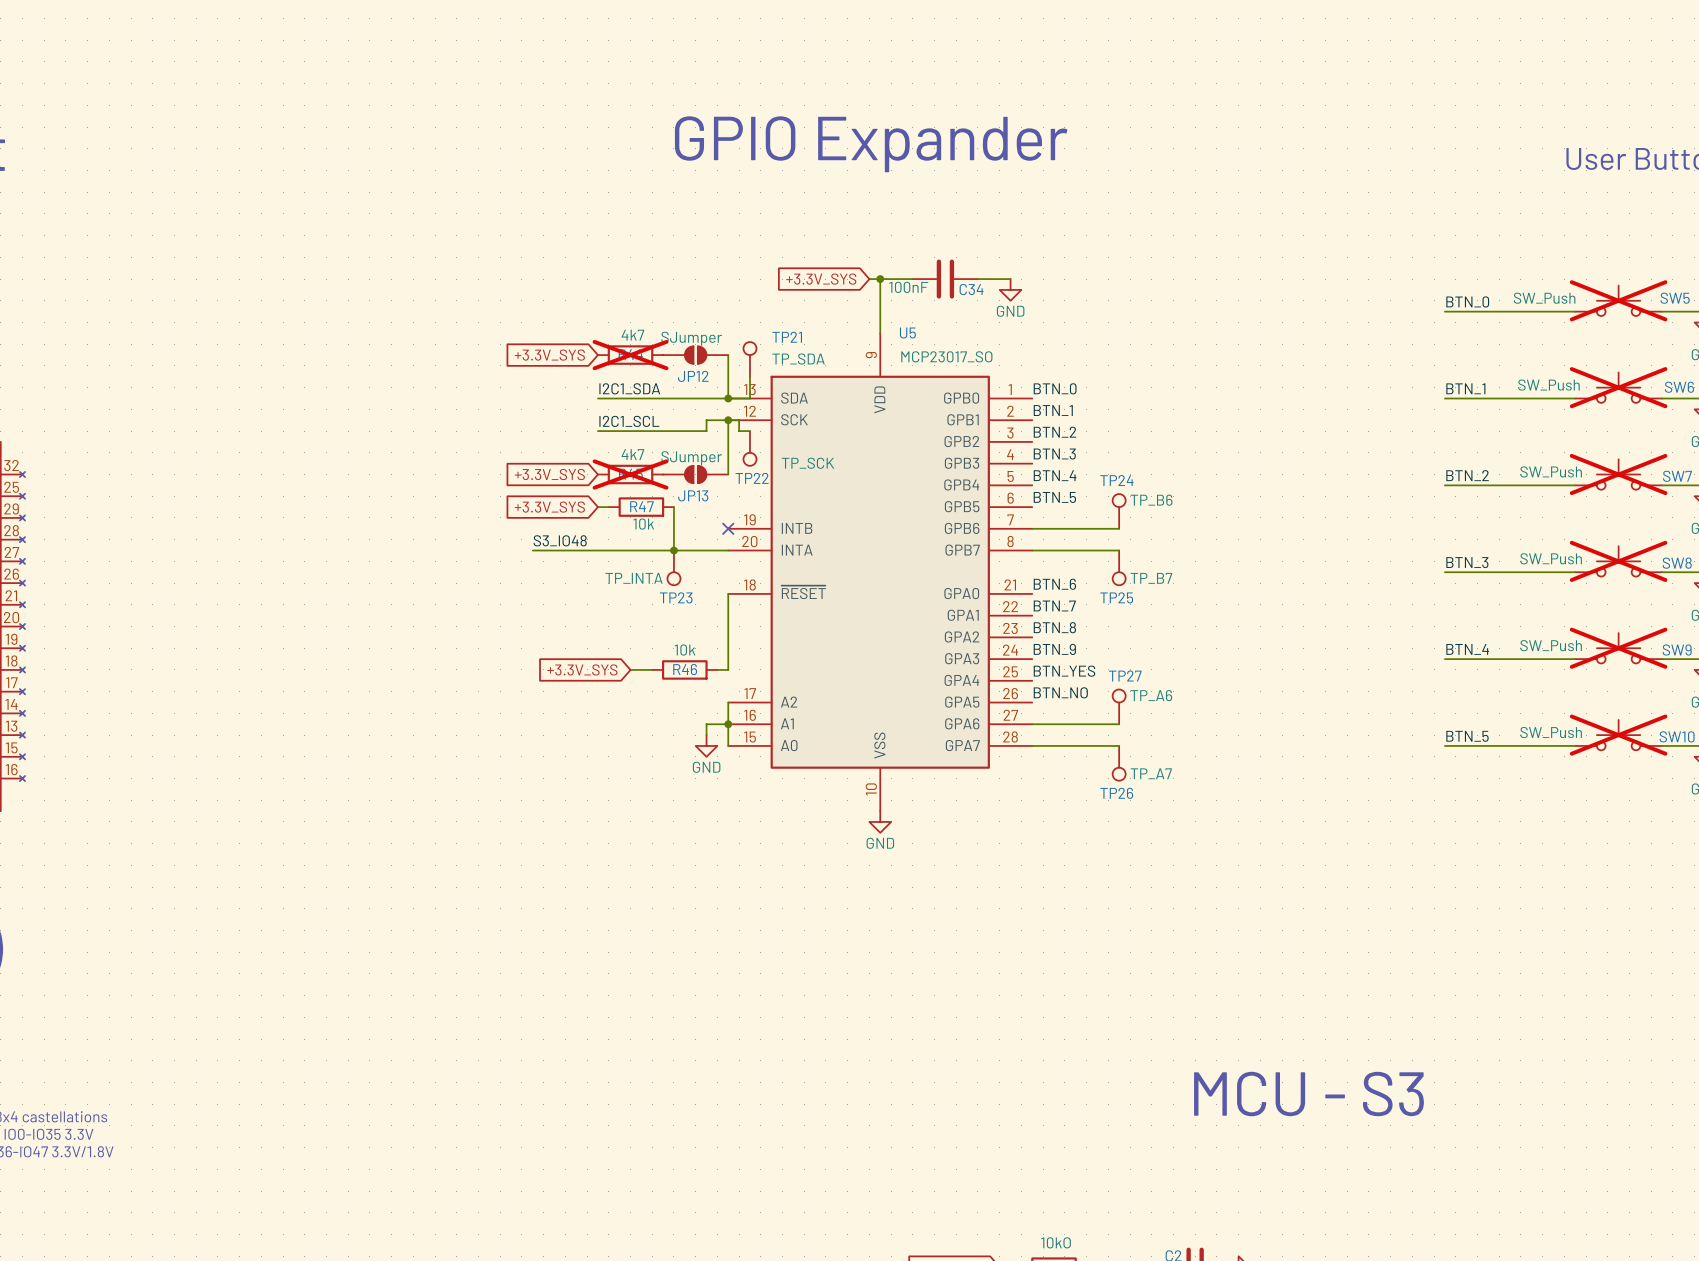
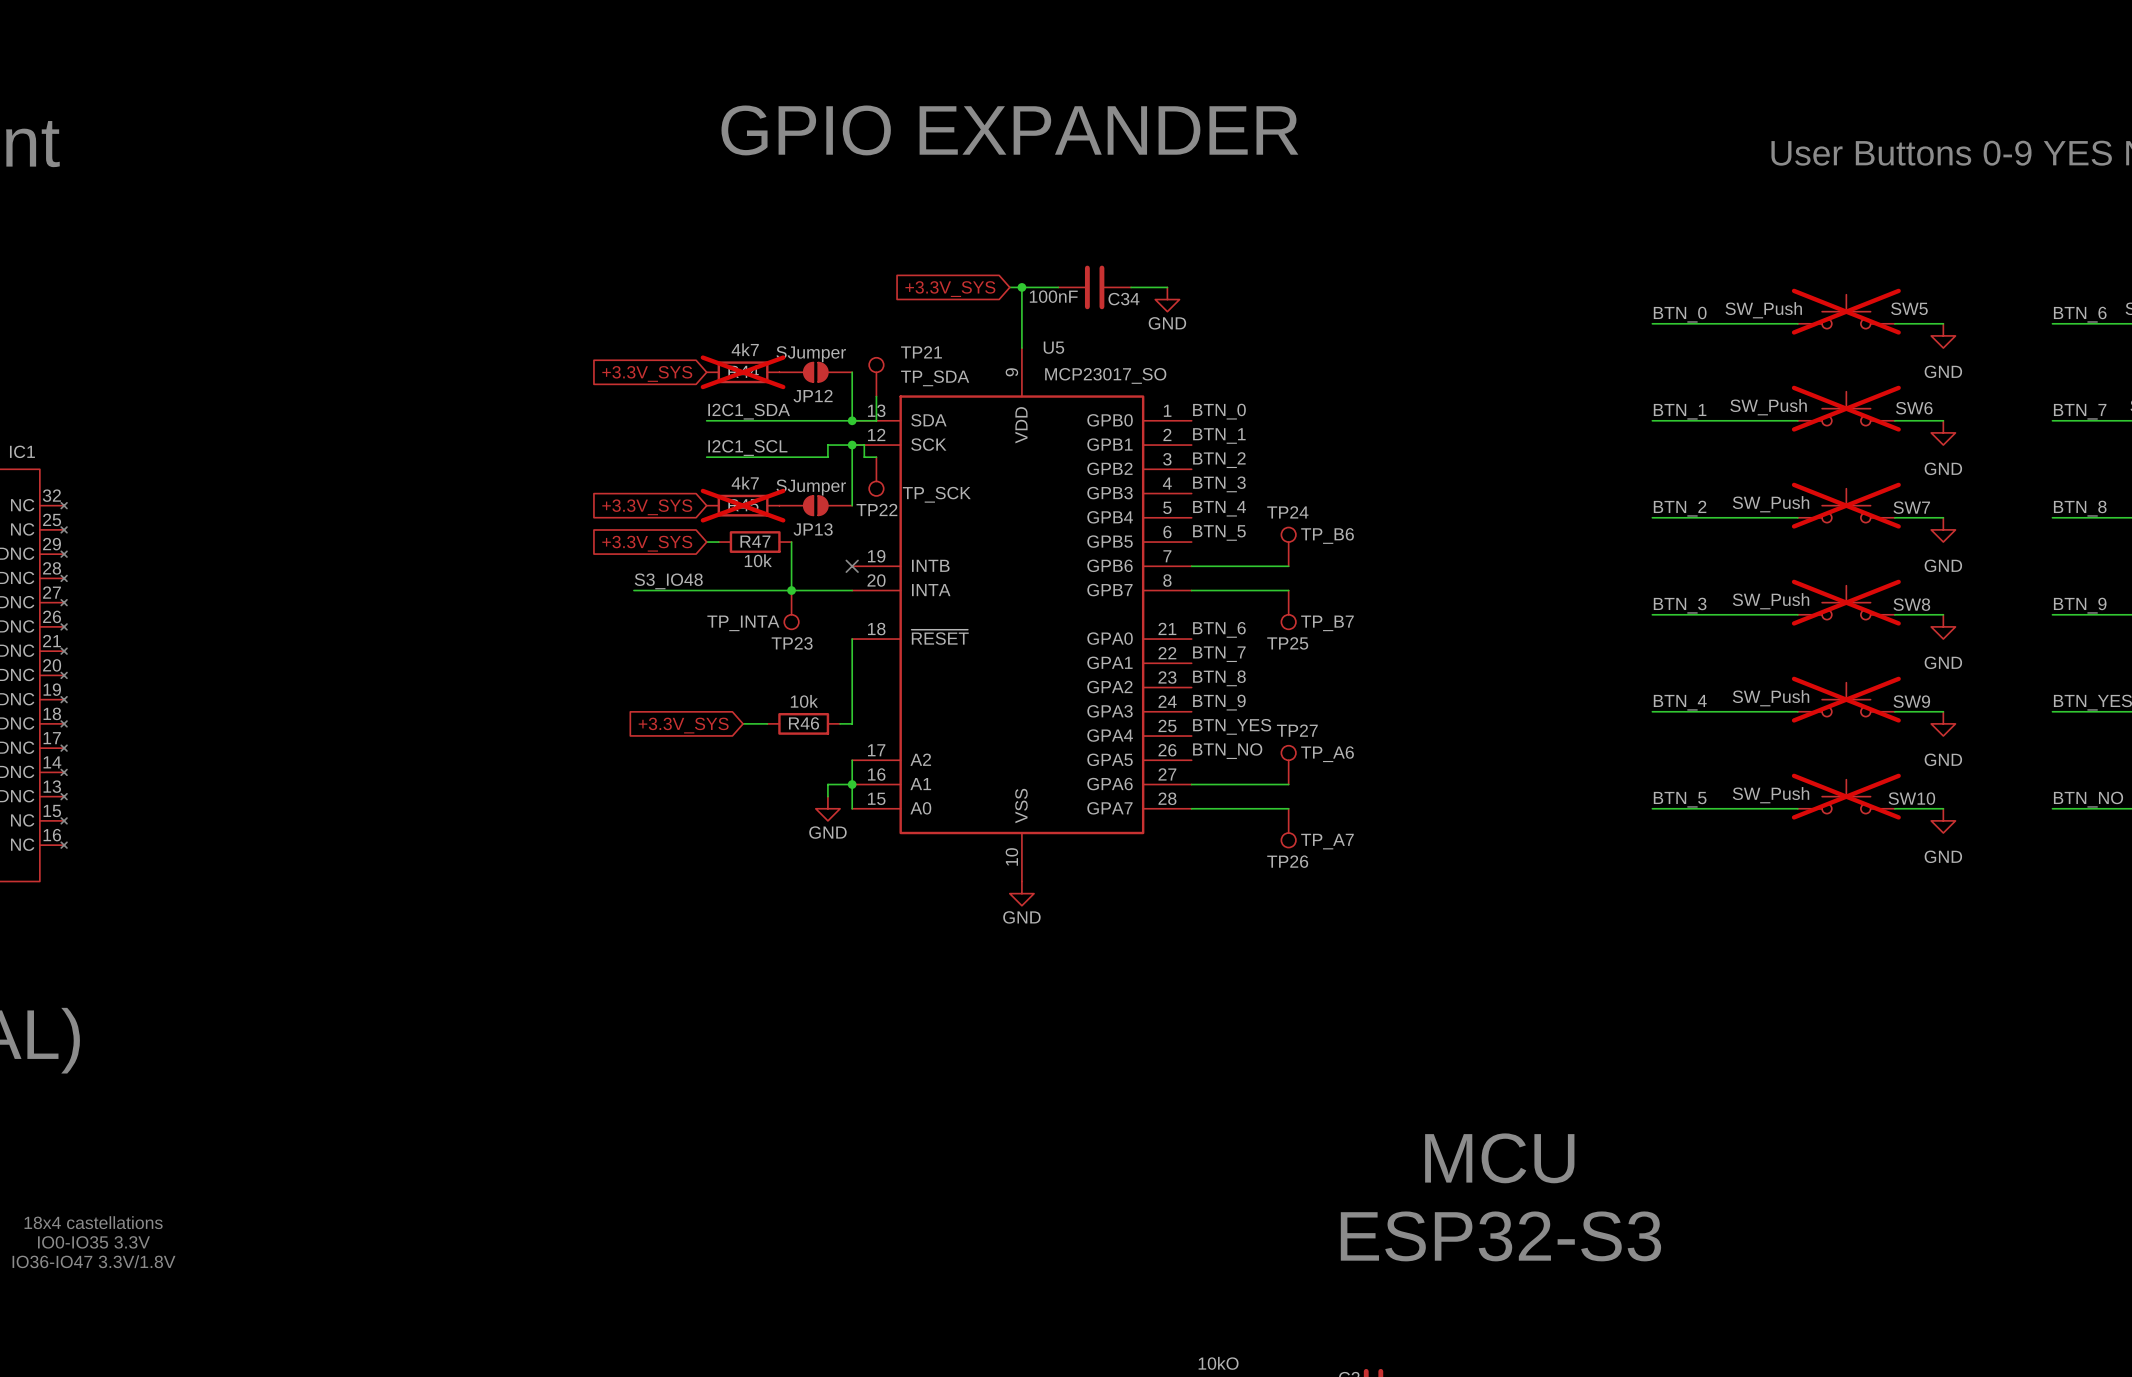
text: GPIO Expander (871, 144) -> GPIO EXPANDER (1009, 130)
text: none -> MCU (1499, 1158)
text: MCU - S3 (1308, 1094) -> none
text: none -> ESP32-S3 (1500, 1236)

